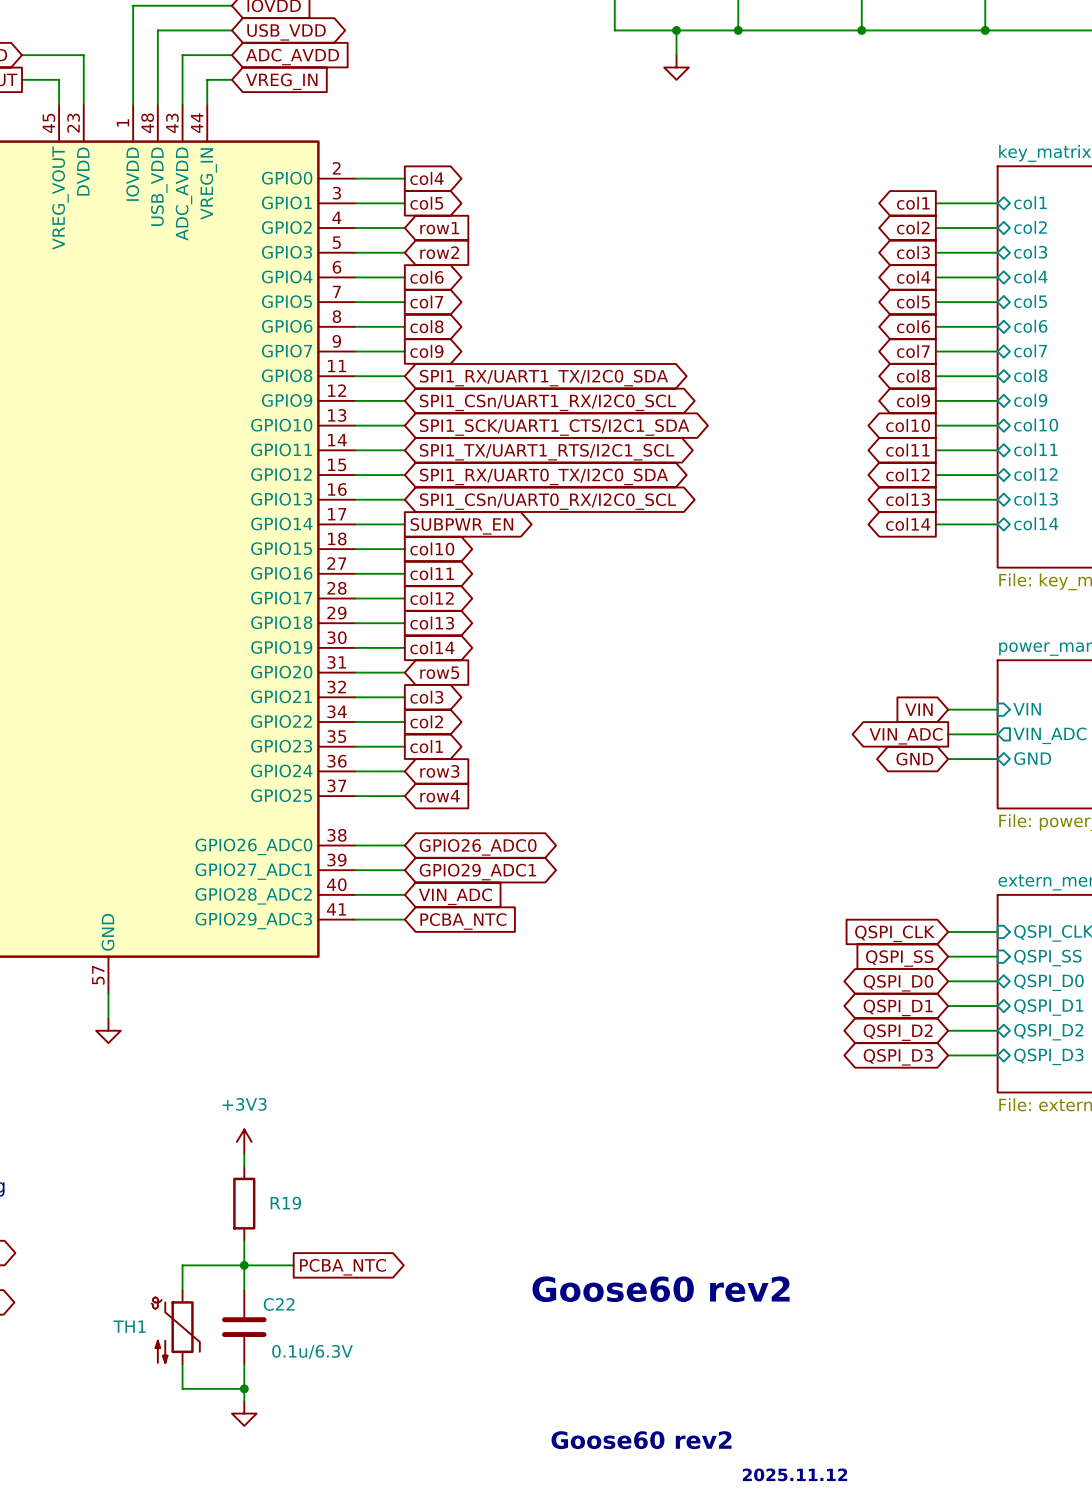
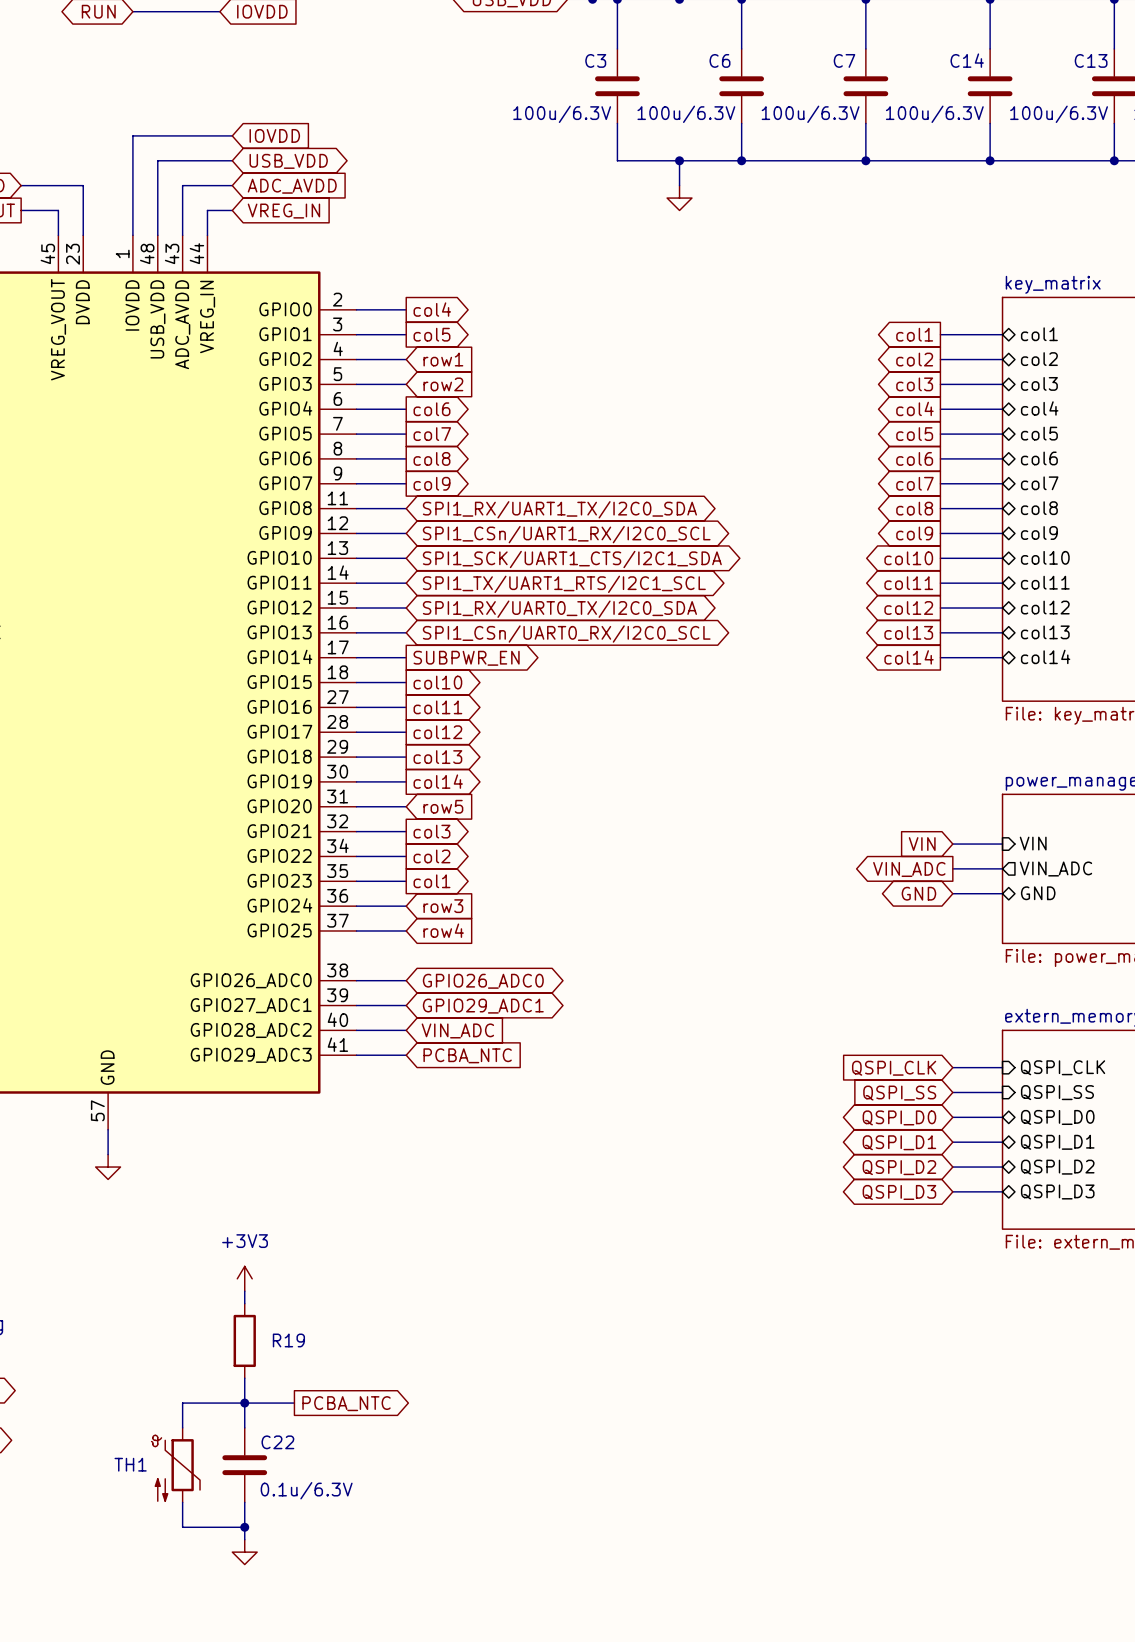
text: Goose60 rev2 (661, 1289) -> none
text: Goose60 rev2 (641, 1440) -> none
text: 2025.11.12 (795, 1474) -> none

